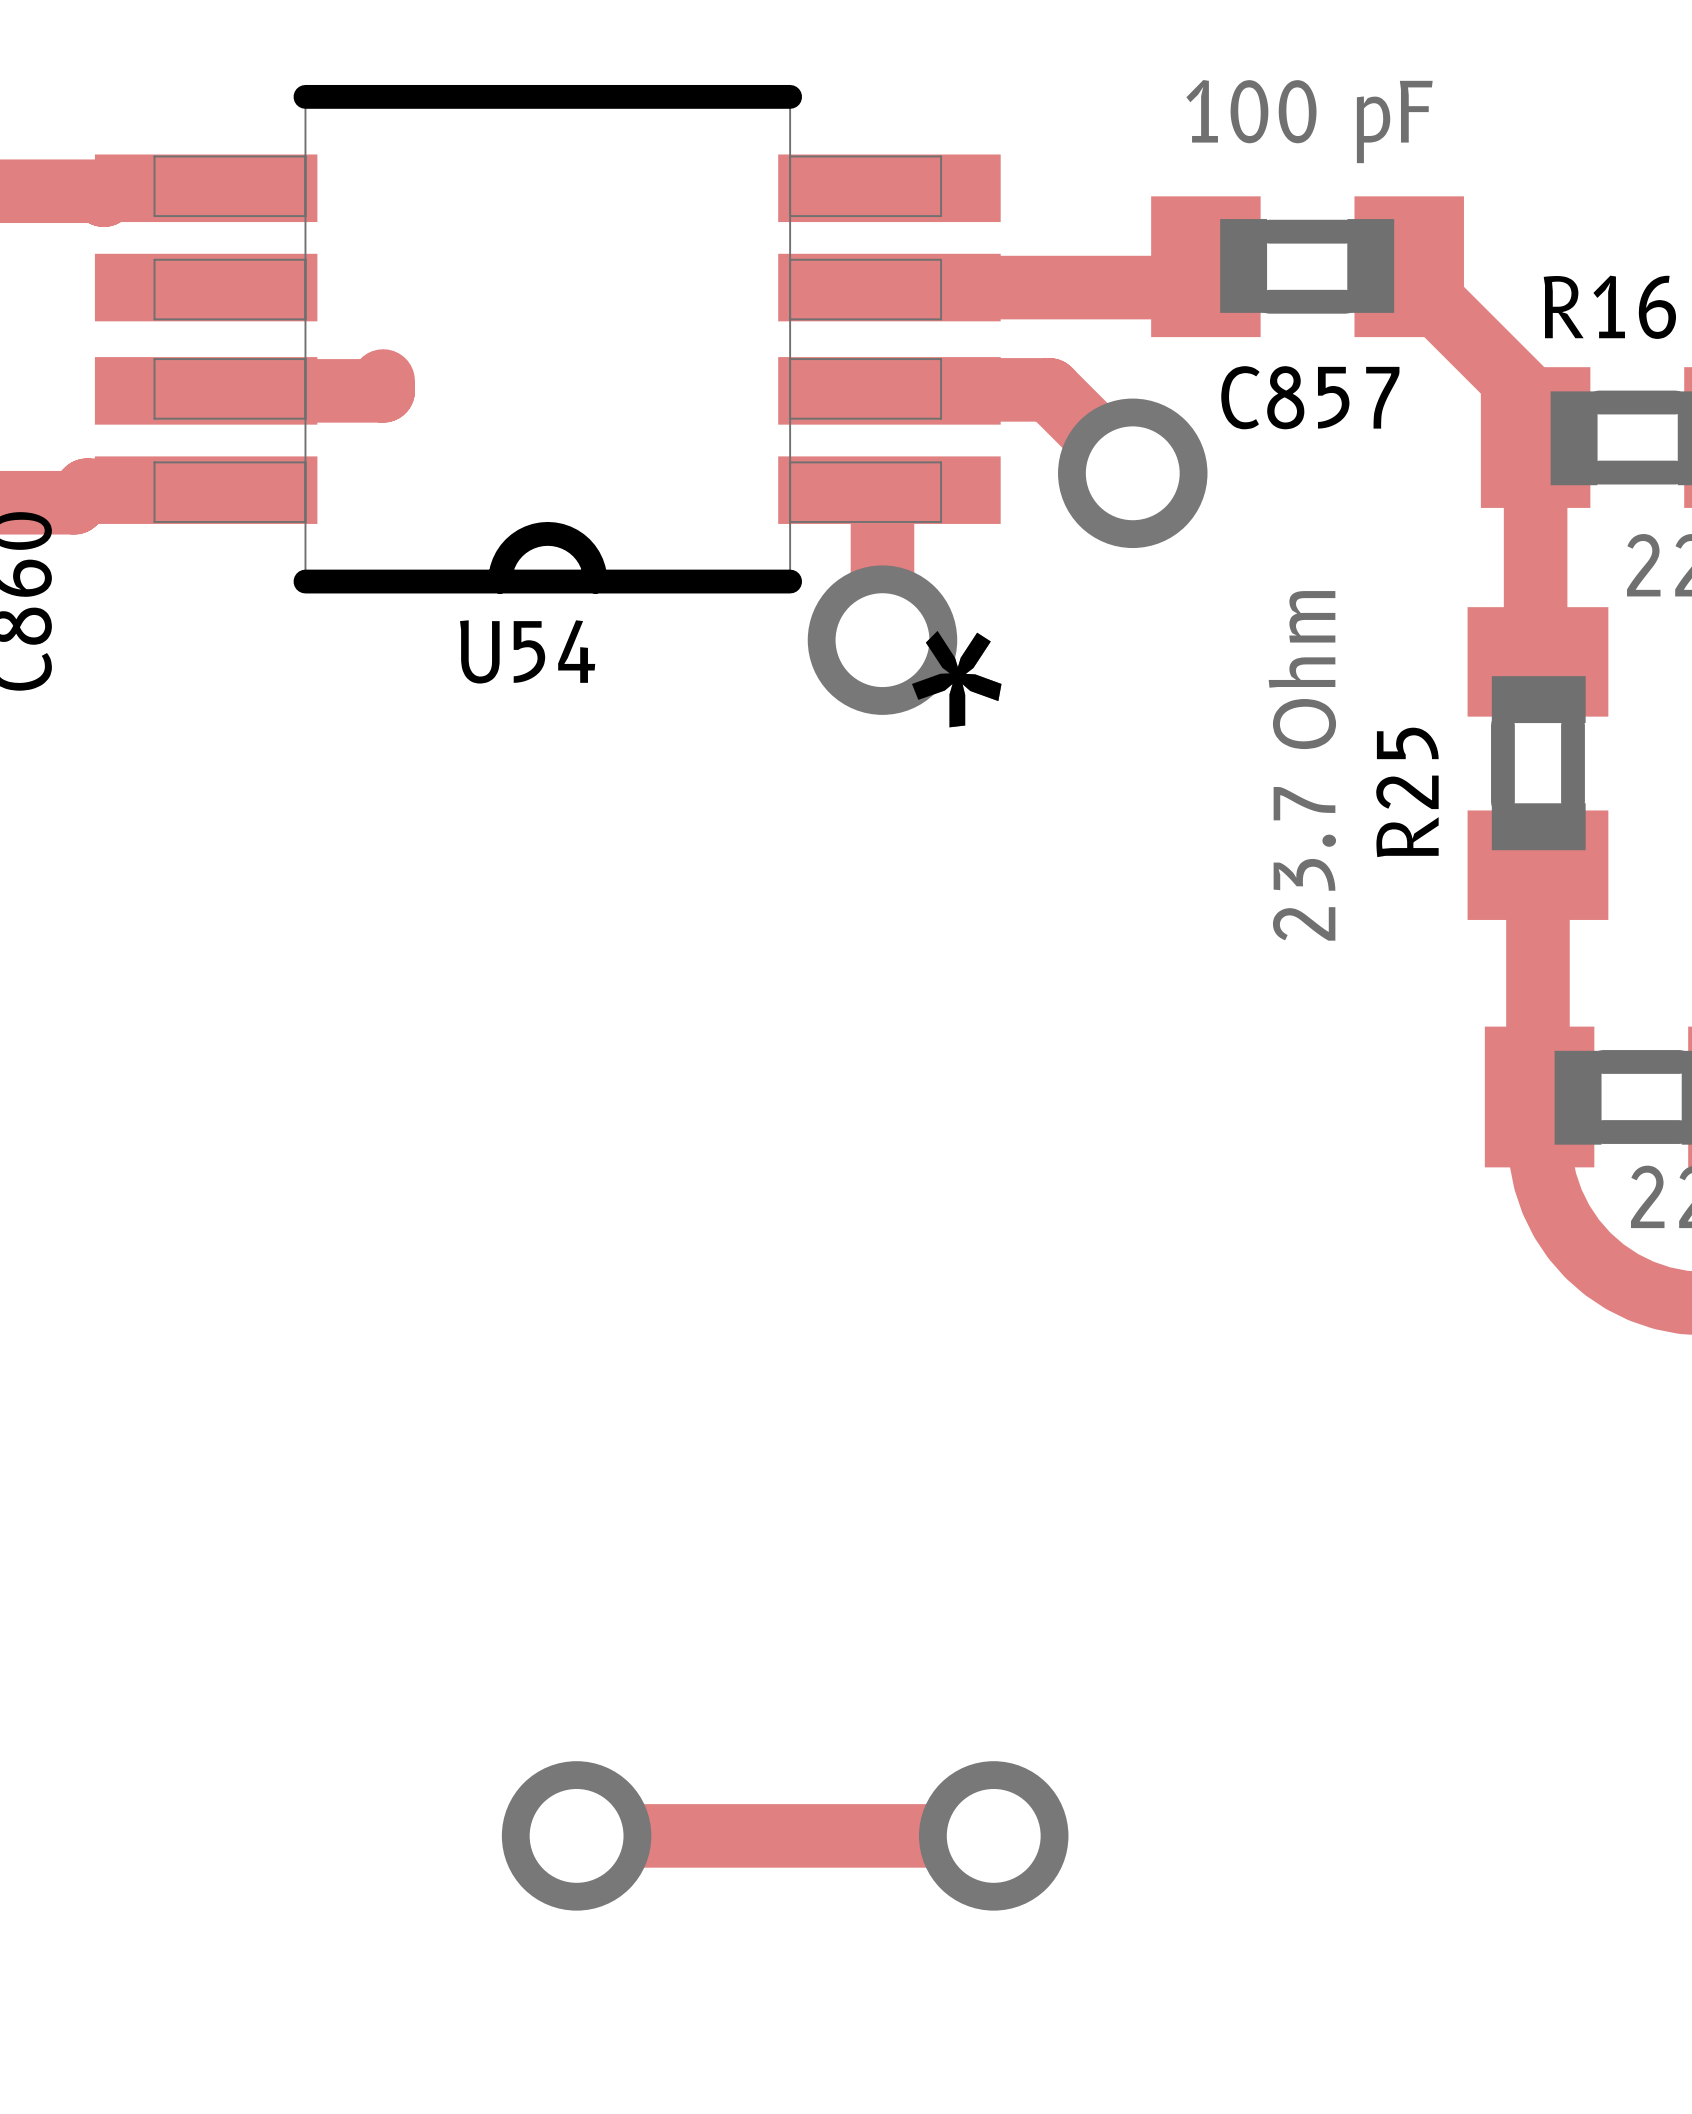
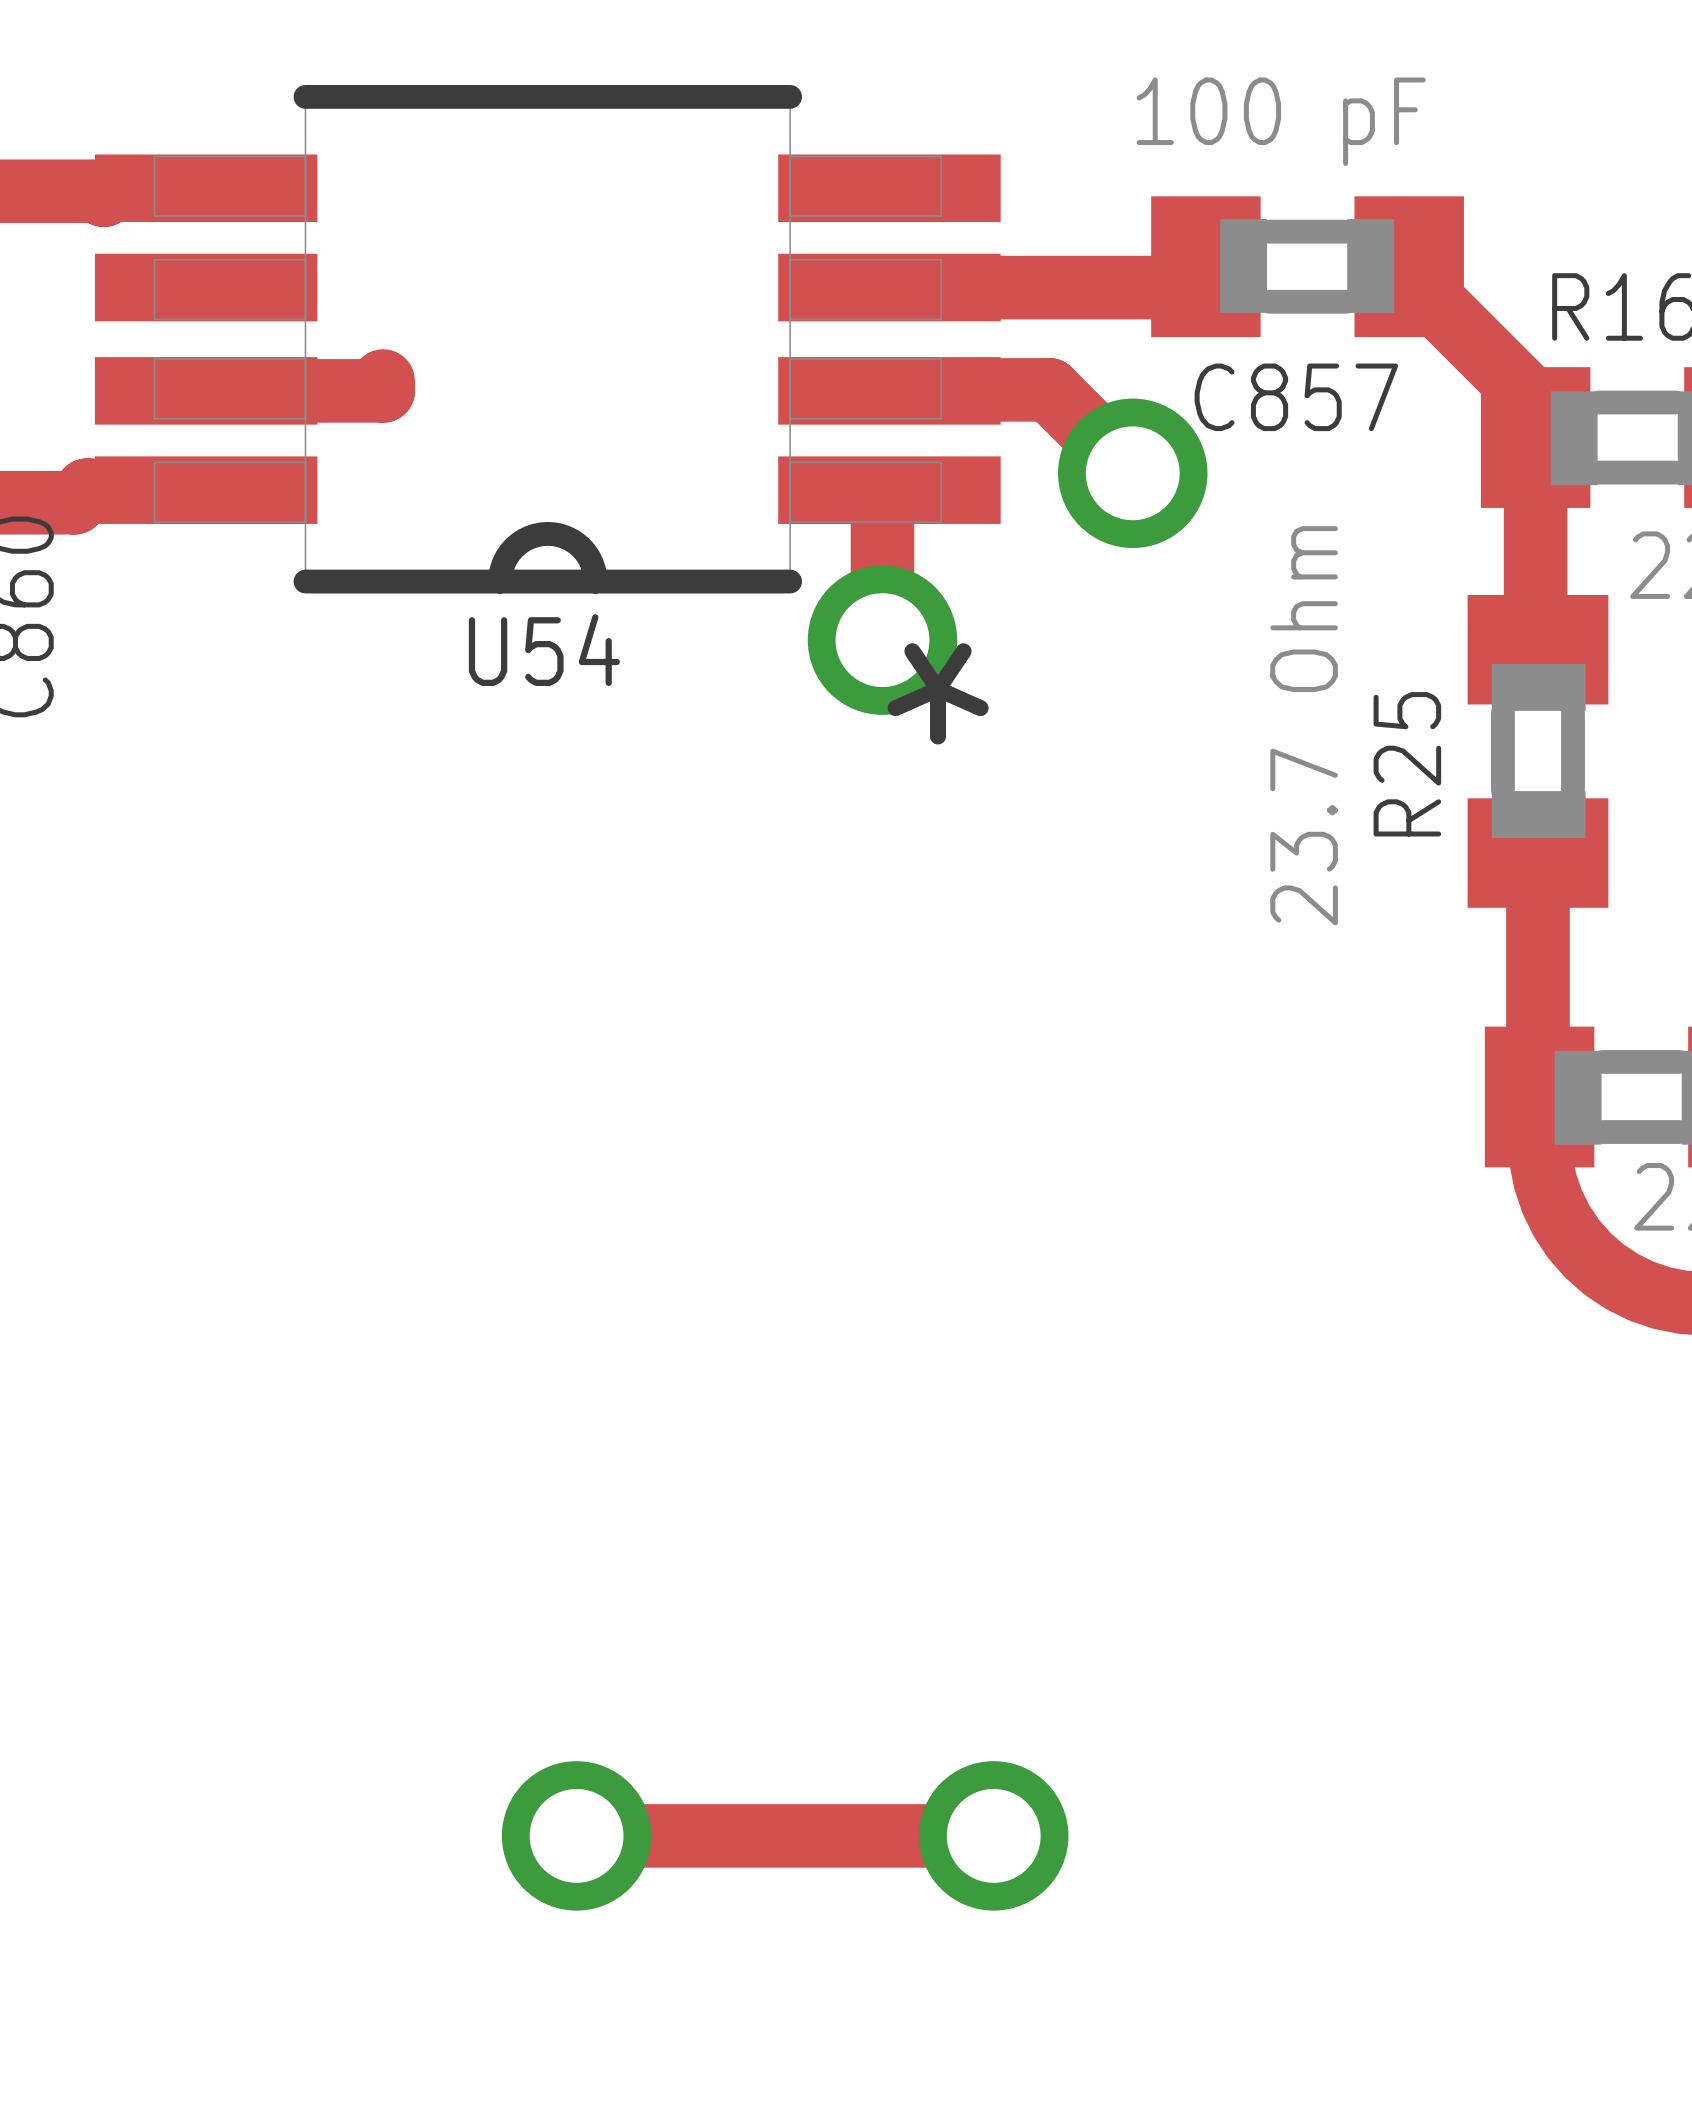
R25 position: (1537, 763) -> (1537, 751)

